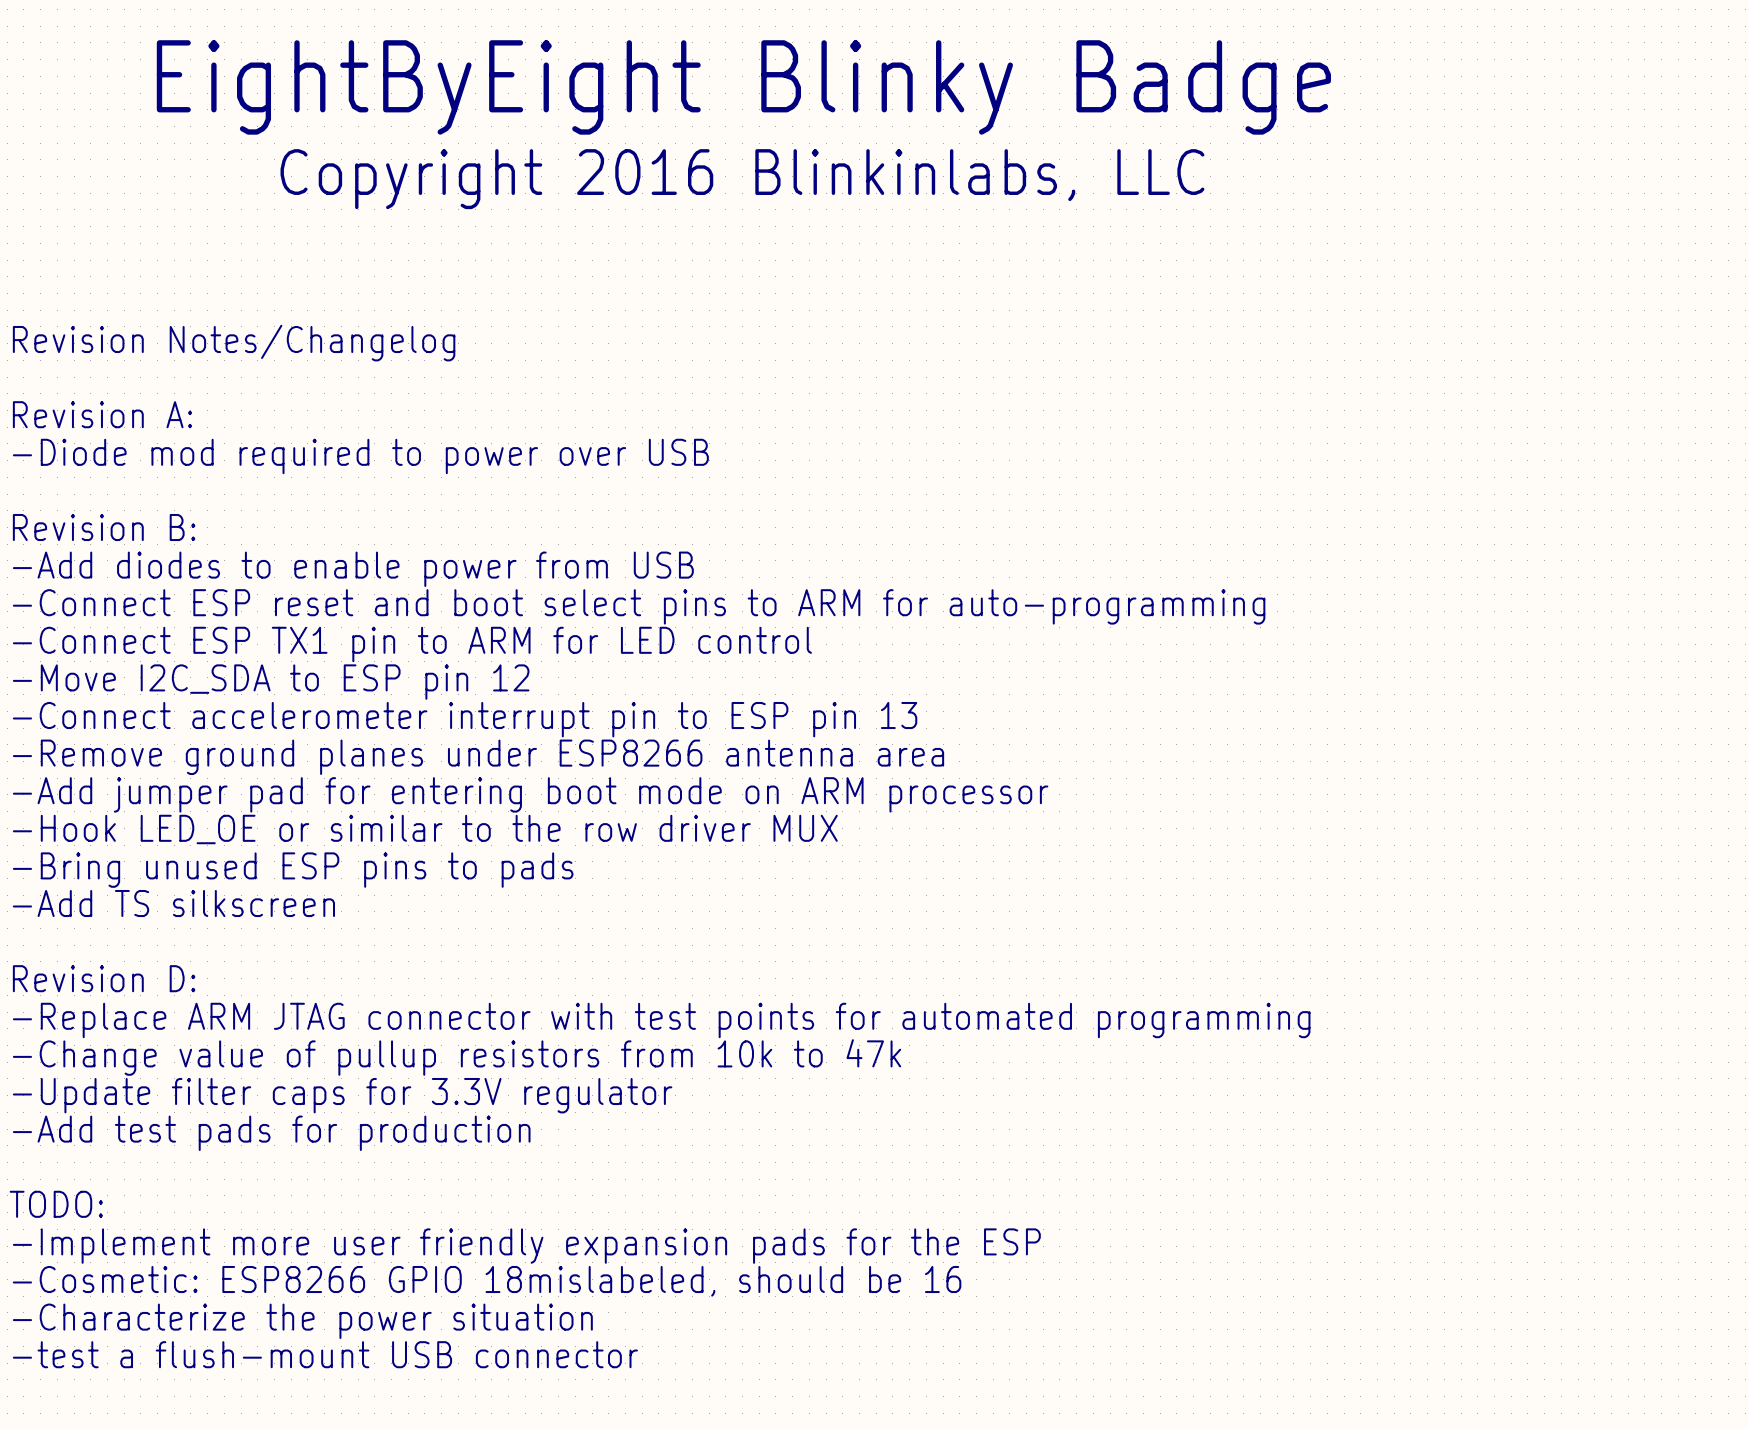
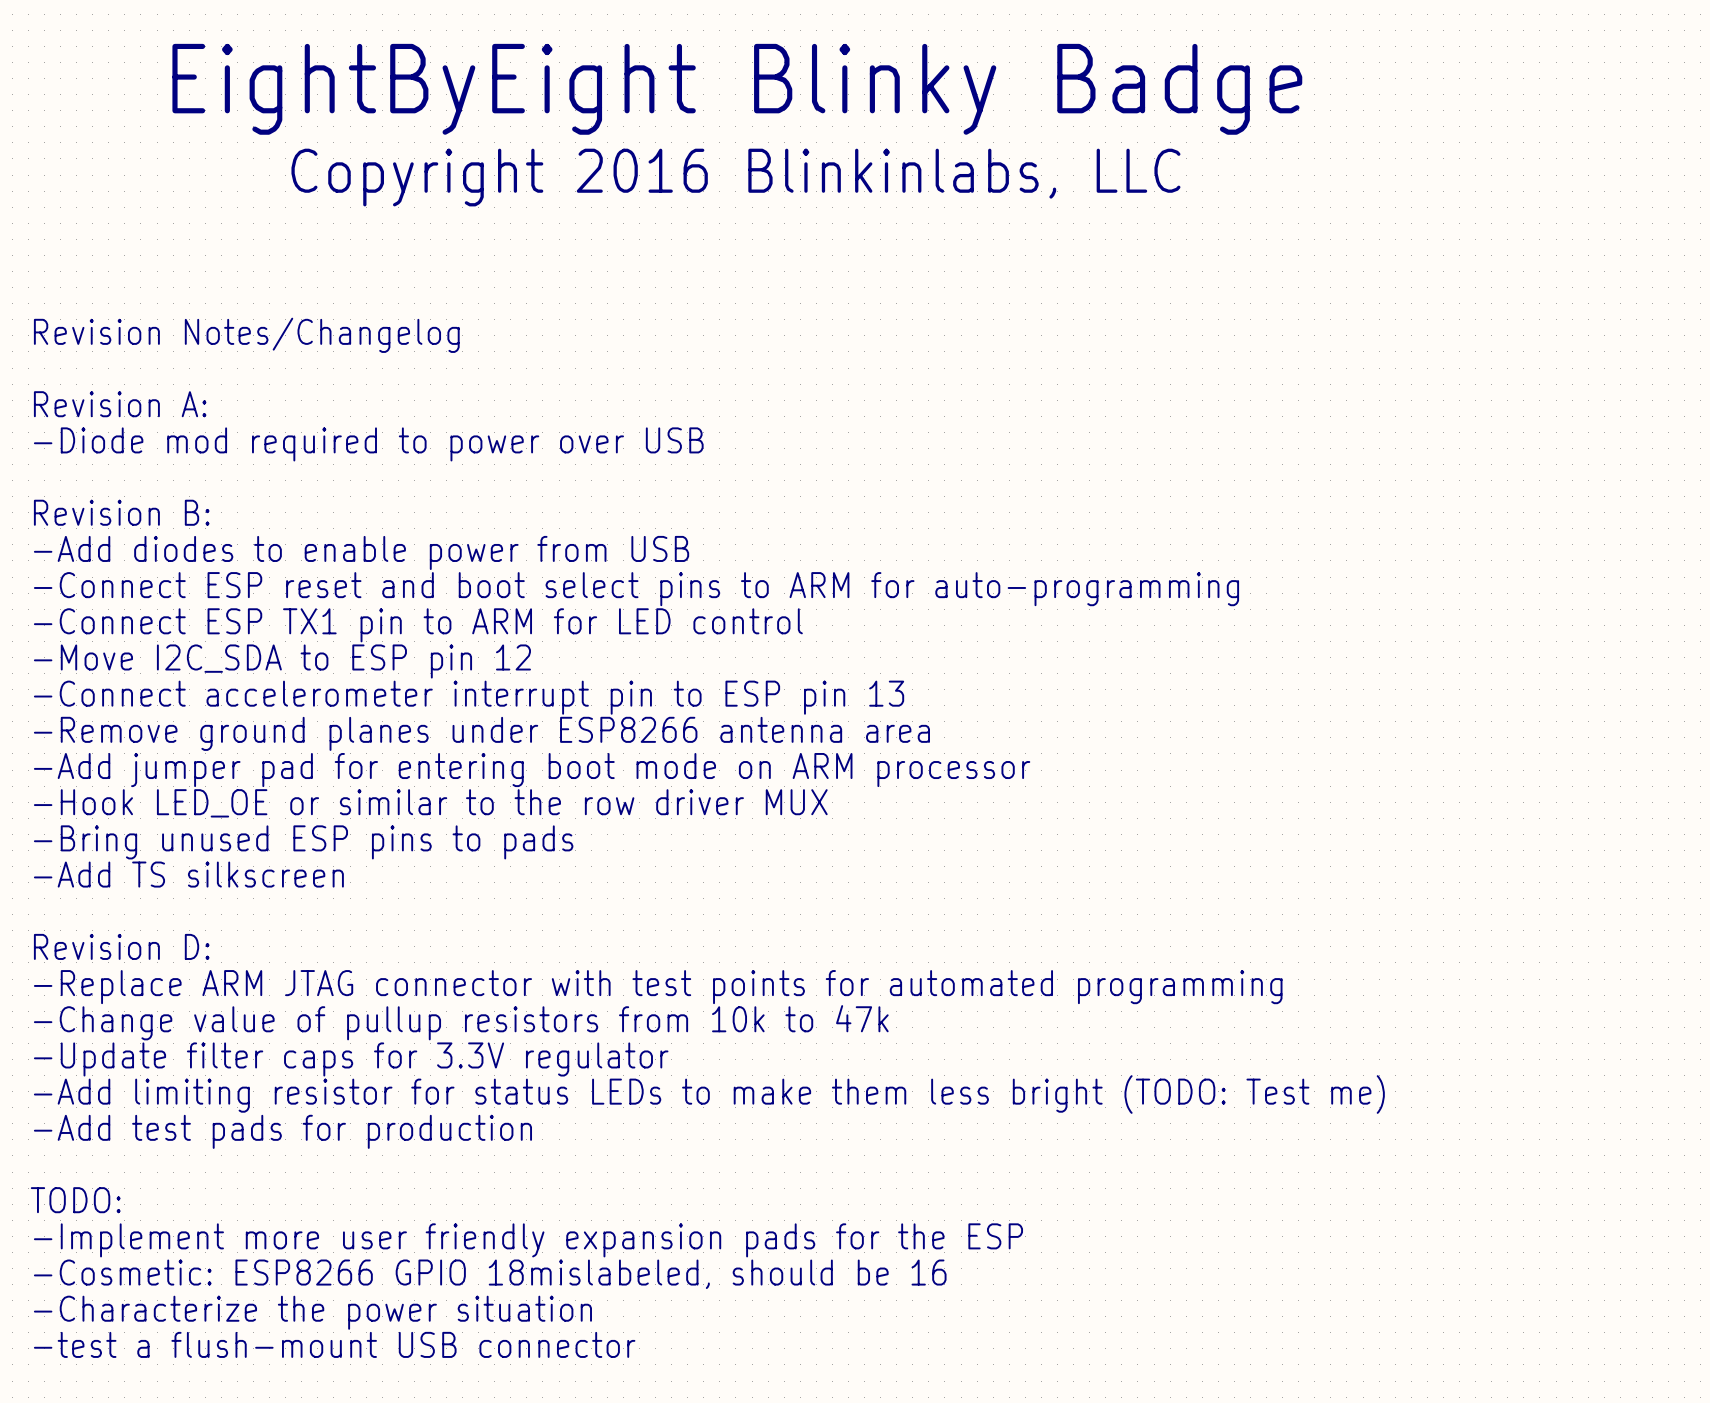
text: -Add test pads for production (271, 1133) -> -Add limiting resistor for status LEDs to make them less bright (TODO: Test me) (709, 1094)
text: none -> -Add test pads for production (282, 1131)
text: TODO: (56, 1204) -> none
text: -Implement more user friendly expansion pads for the ESP (526, 1246) -> TODO: (75, 1200)
text: -Cosmetic: ESP8266 GPIO 18mislabeled, should be 16 (487, 1281) -> -Implement more user friendly expansion pads for the ESP (528, 1240)
text: -Characterize the power situation (302, 1321) -> -Cosmetic: ESP8266 GPIO 18mislabeled, should be 16 (490, 1274)
text: -test a flush-mount USB connector (325, 1354) -> -Characterize the power situation (312, 1312)
text: none -> -test a flush-mount USB connector (334, 1344)

